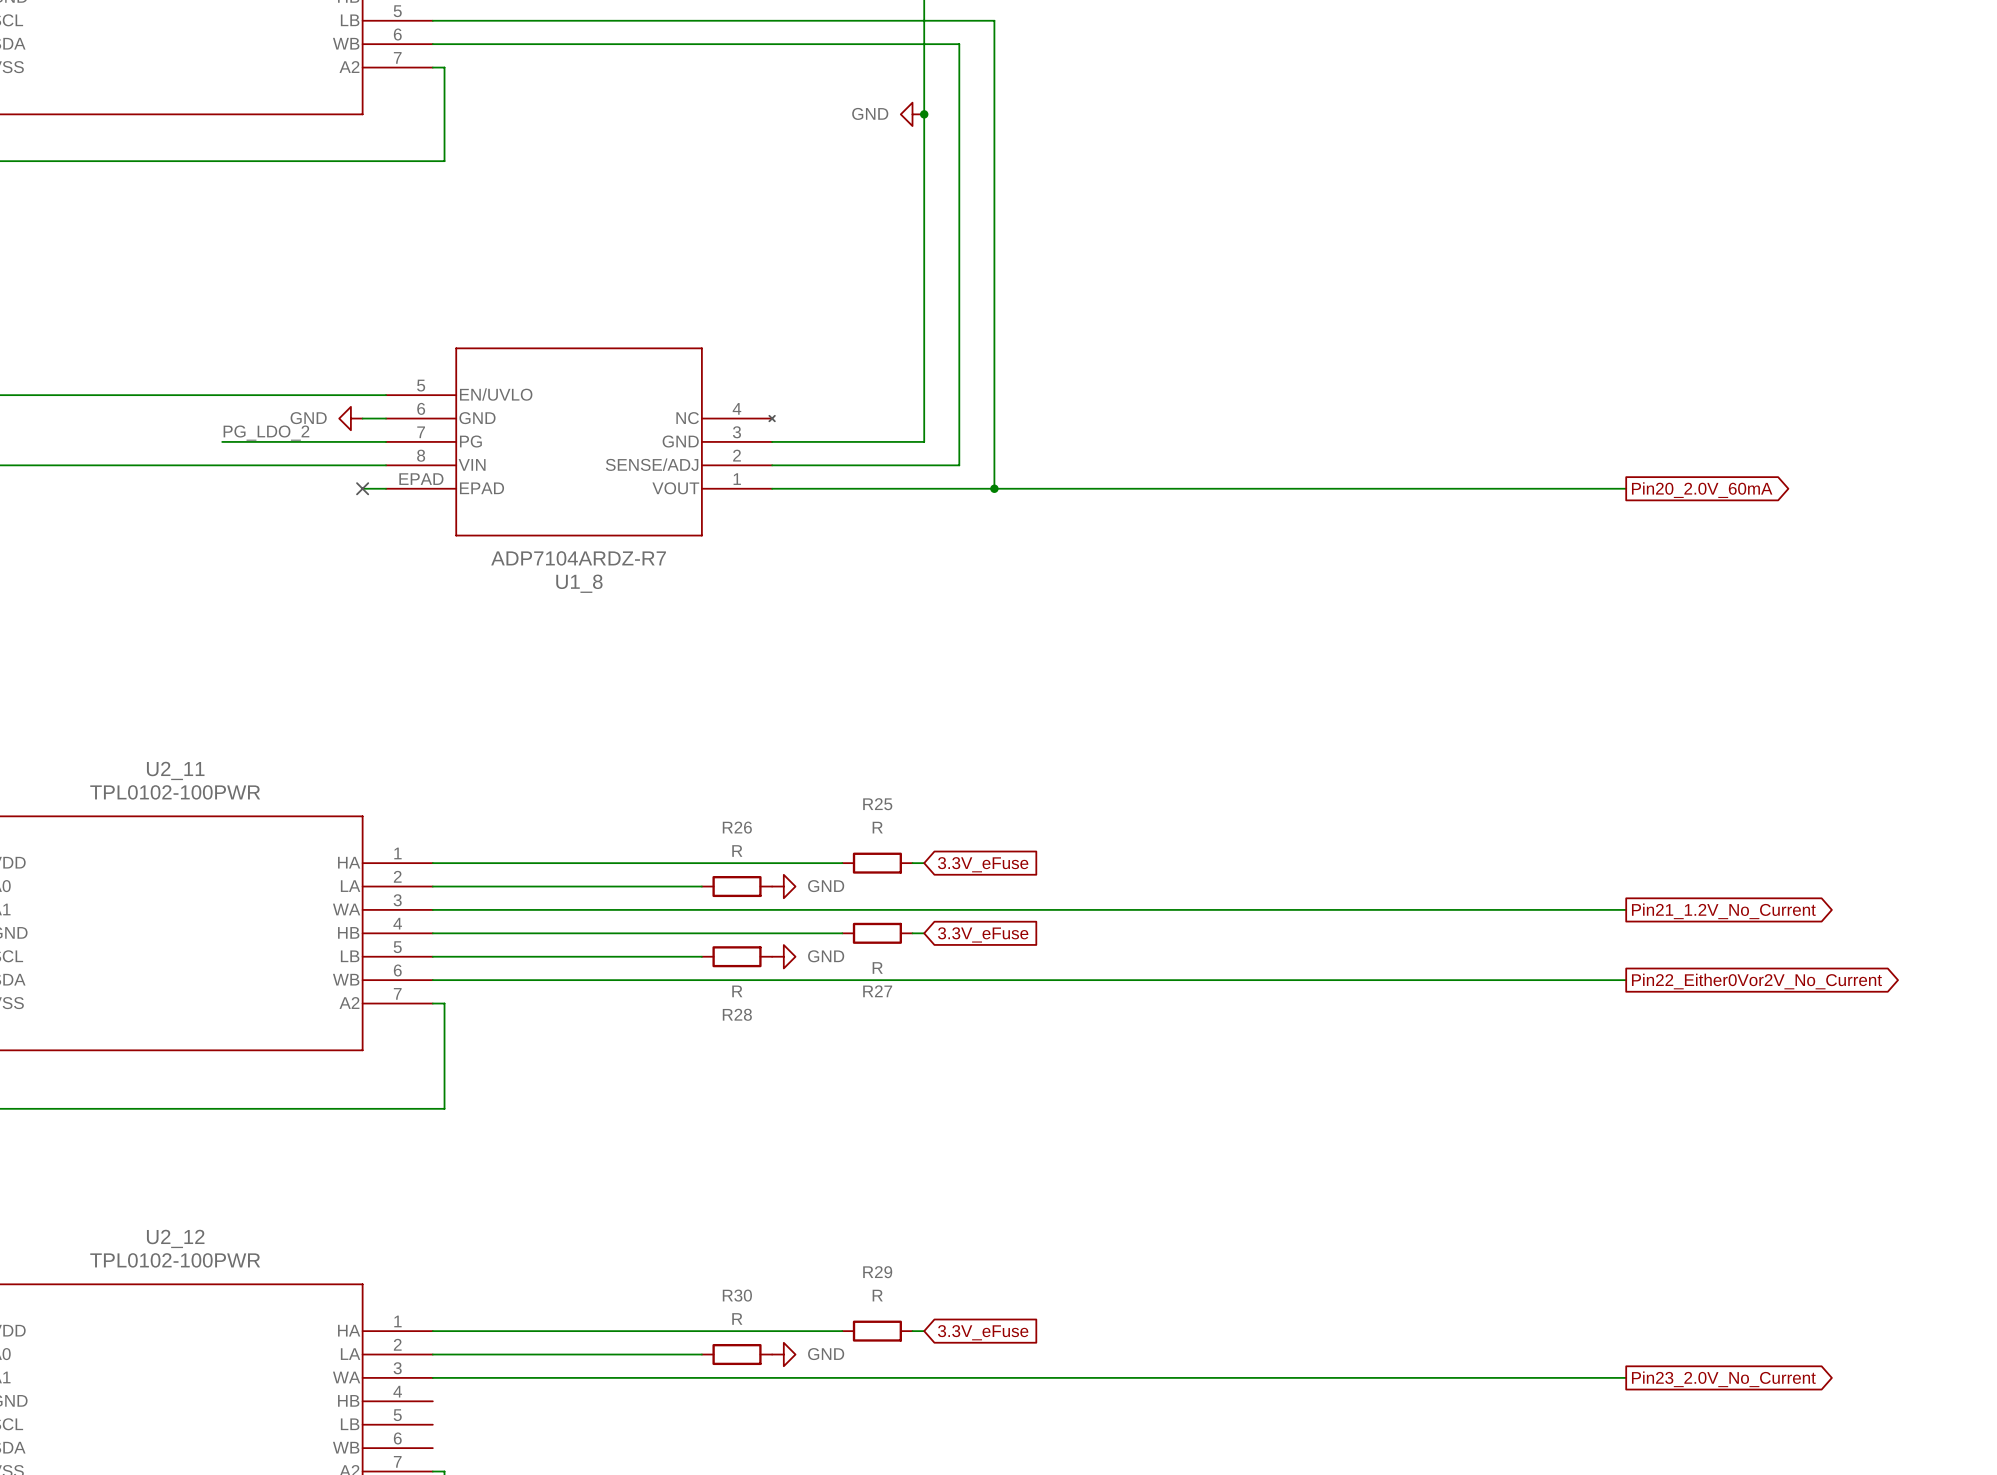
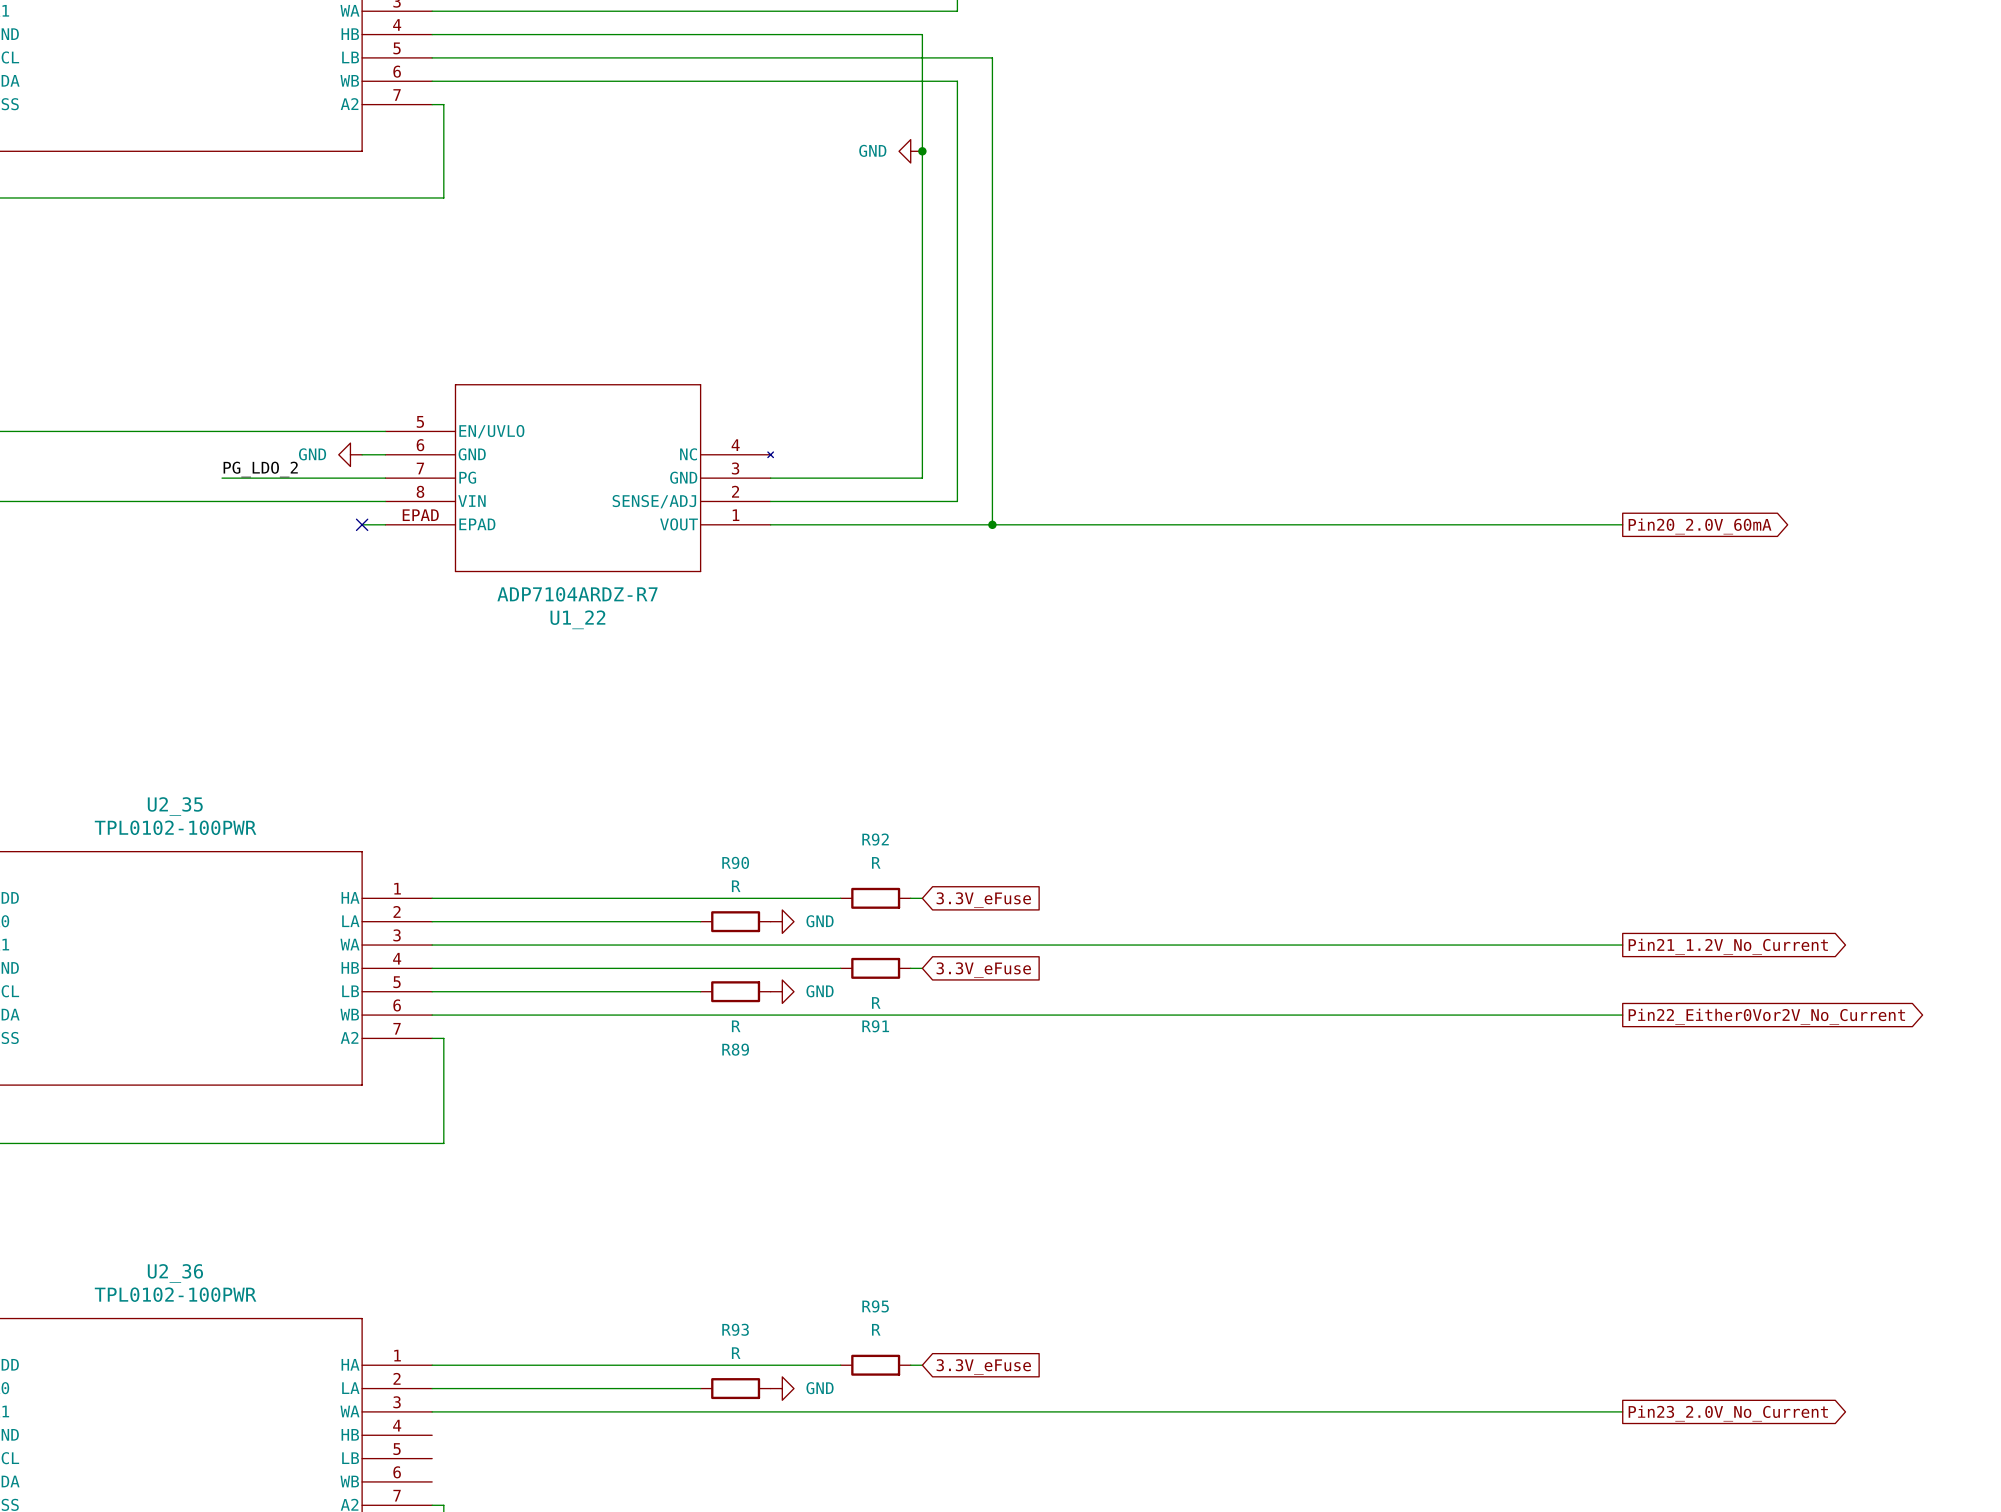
U1_8 name: U1_8 (579, 583) -> U1_22 (577, 619)
U2_11 name: U2_11 (175, 770) -> U2_35 (175, 806)
R25 name: R25 (877, 804) -> R92 (875, 839)
R26 name: R26 (737, 827) -> R90 (735, 862)
R27 name: R27 (877, 991) -> R91 (875, 1026)
R28 name: R28 (737, 1014) -> R89 (735, 1049)
U2_12 name: U2_12 (175, 1238) -> U2_36 (175, 1273)
R29 name: R29 (877, 1272) -> R95 (875, 1306)
R30 name: R30 (737, 1295) -> R93 (735, 1329)

